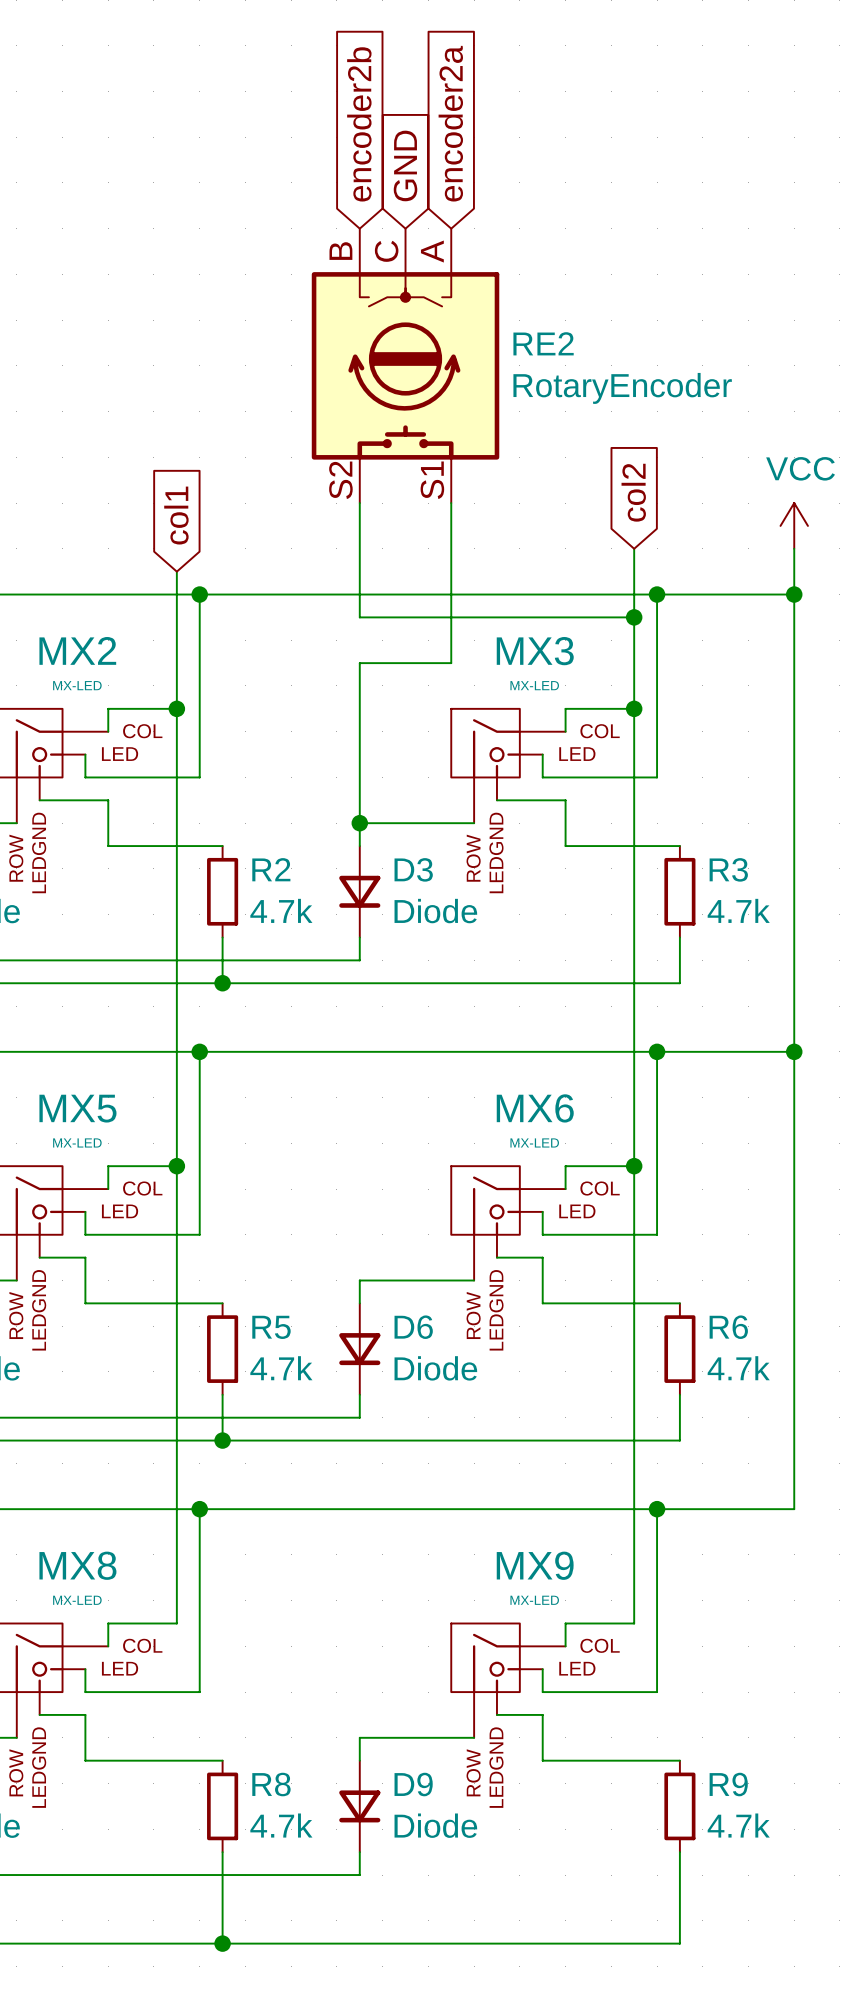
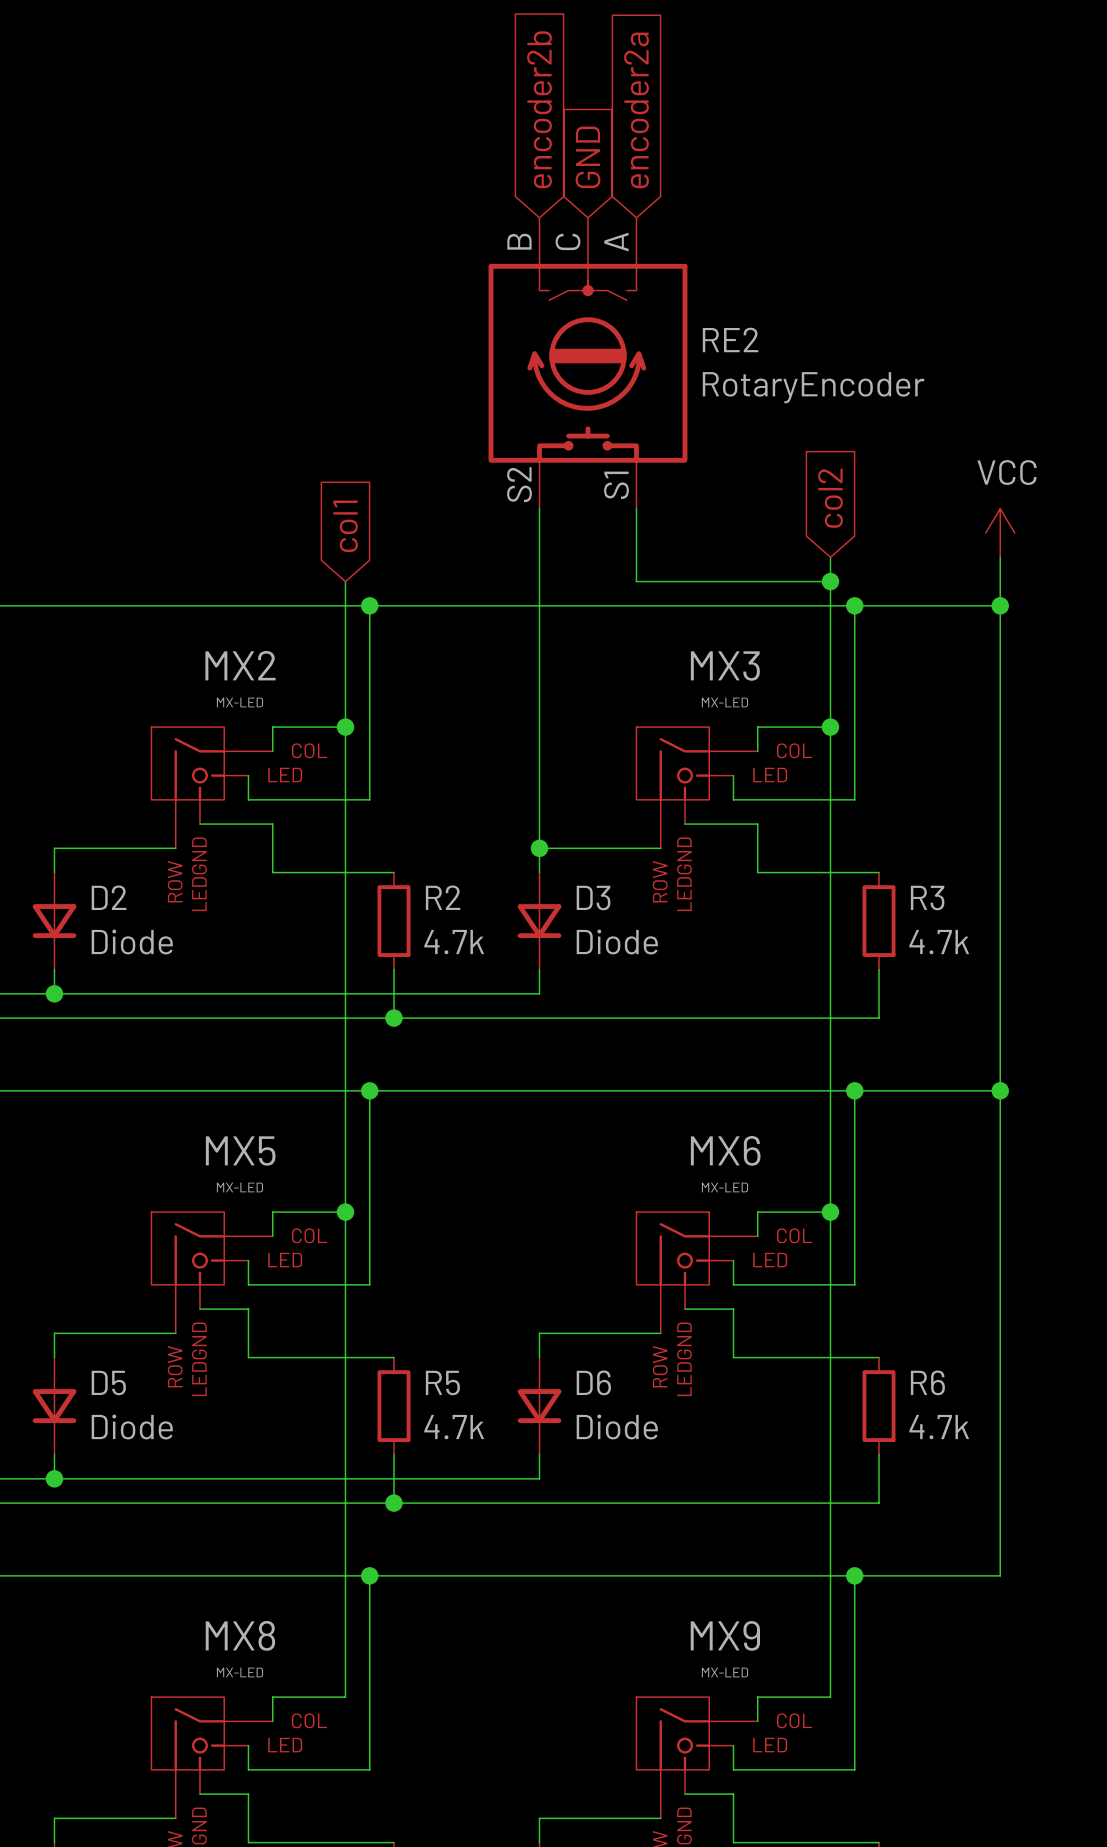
wire: (451, 571) (451, 663) (359, 663) -> (539, 630) (539, 678)
wire: none -> (636, 581) (830, 581)
wire: (359, 617) (634, 617) -> none
junction position: (634, 617) -> (830, 581)

